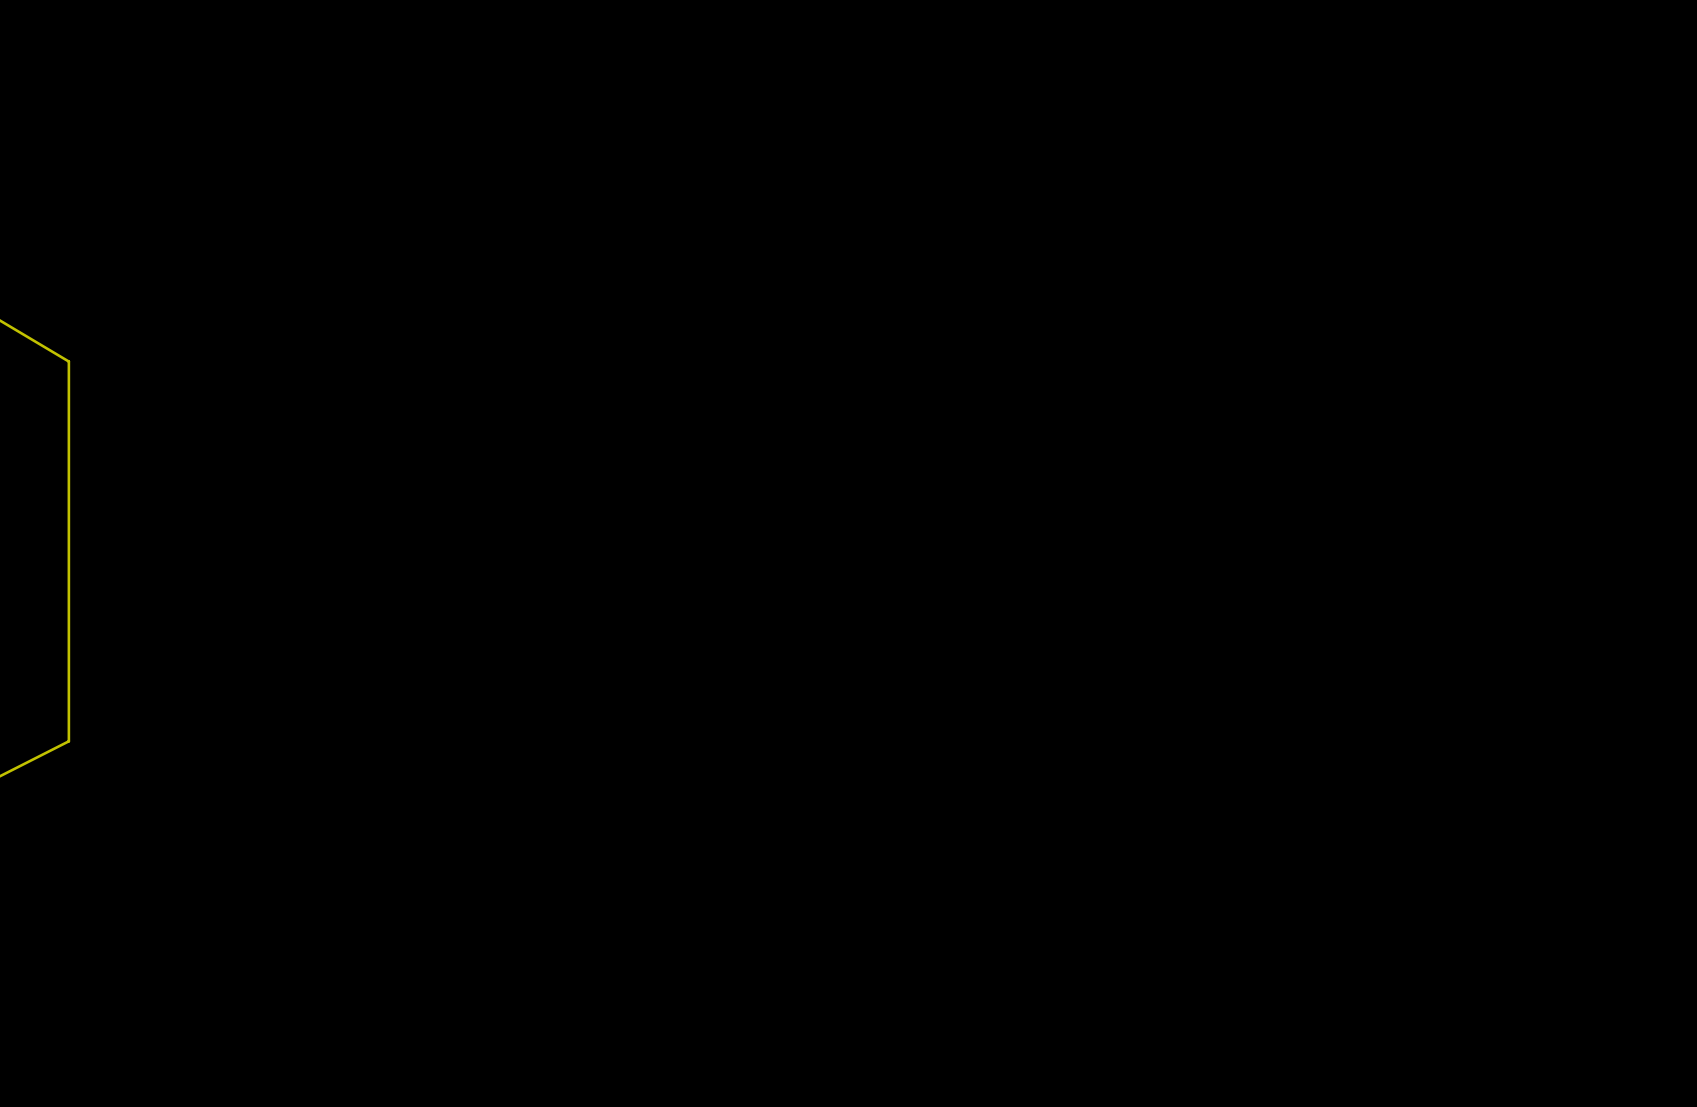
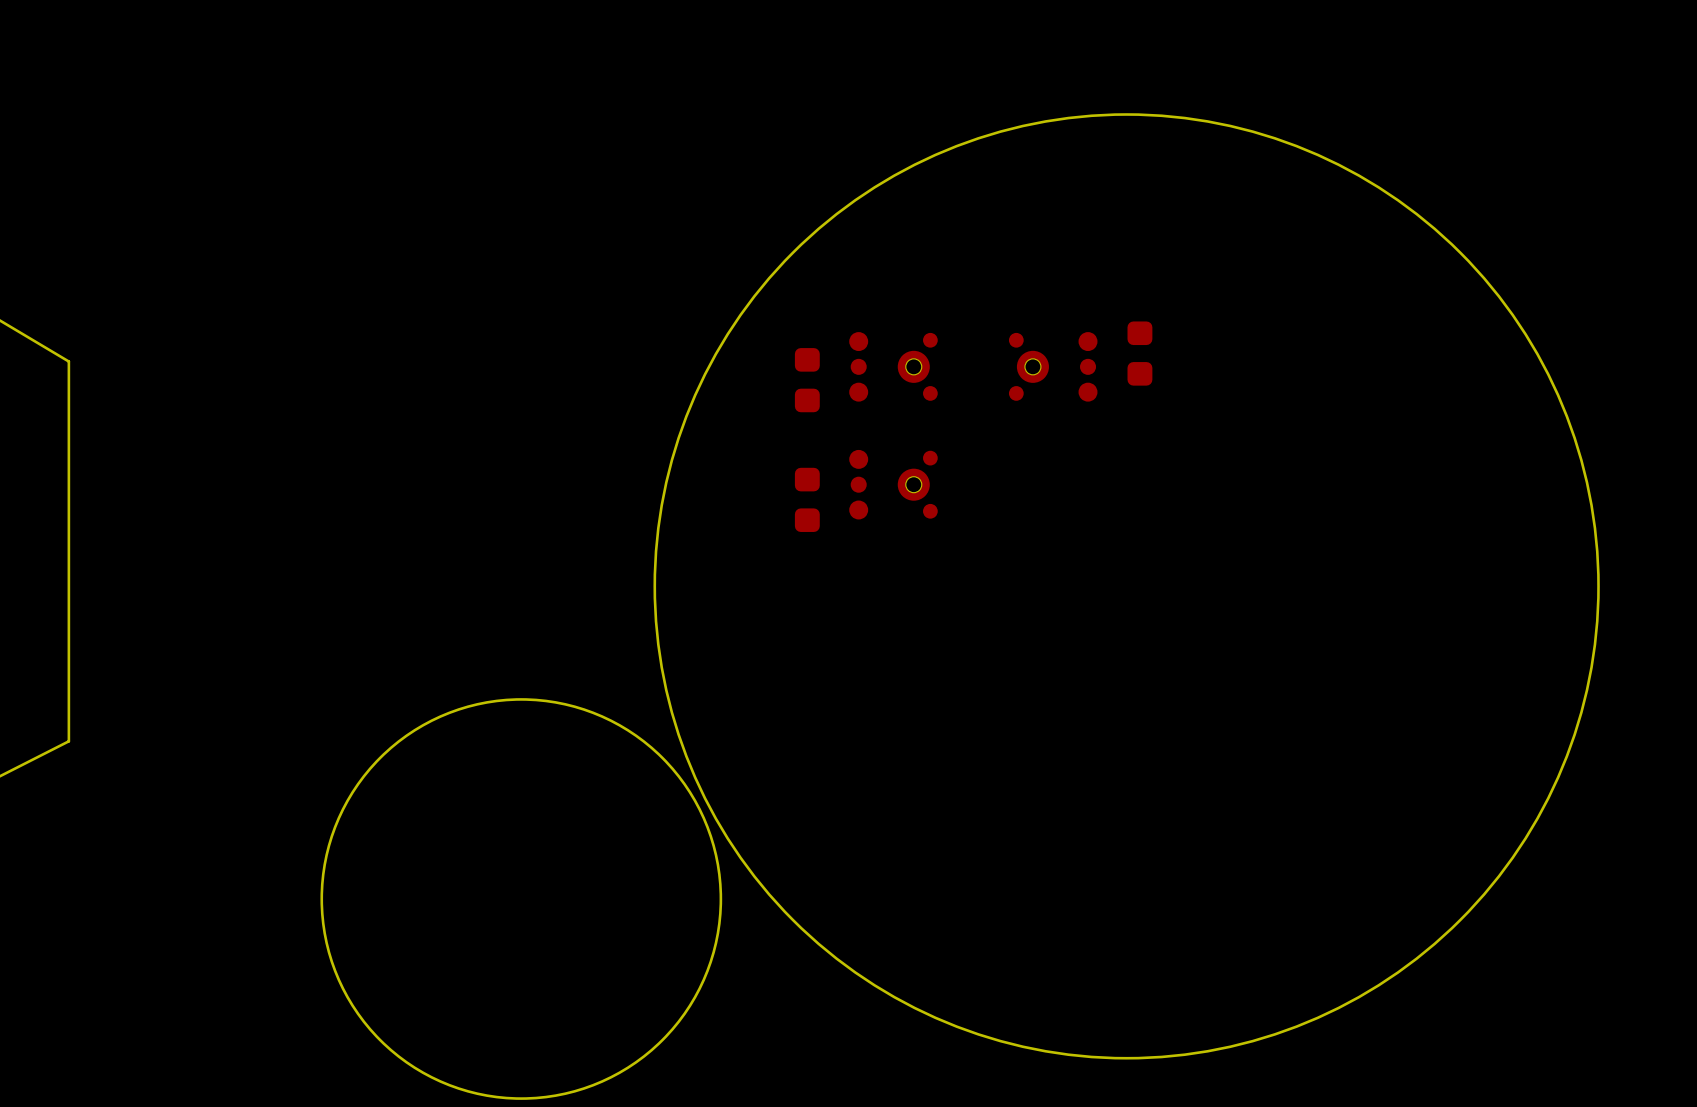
round board edge: none -> [653, 113, 1600, 1060]
part: none -> (1139, 353)
part: none -> (893, 366)
part: none -> (1053, 366)
part: none -> (807, 380)
part: none -> (893, 484)
part: none -> (807, 499)
round board edge: none -> [320, 698, 723, 1100]

